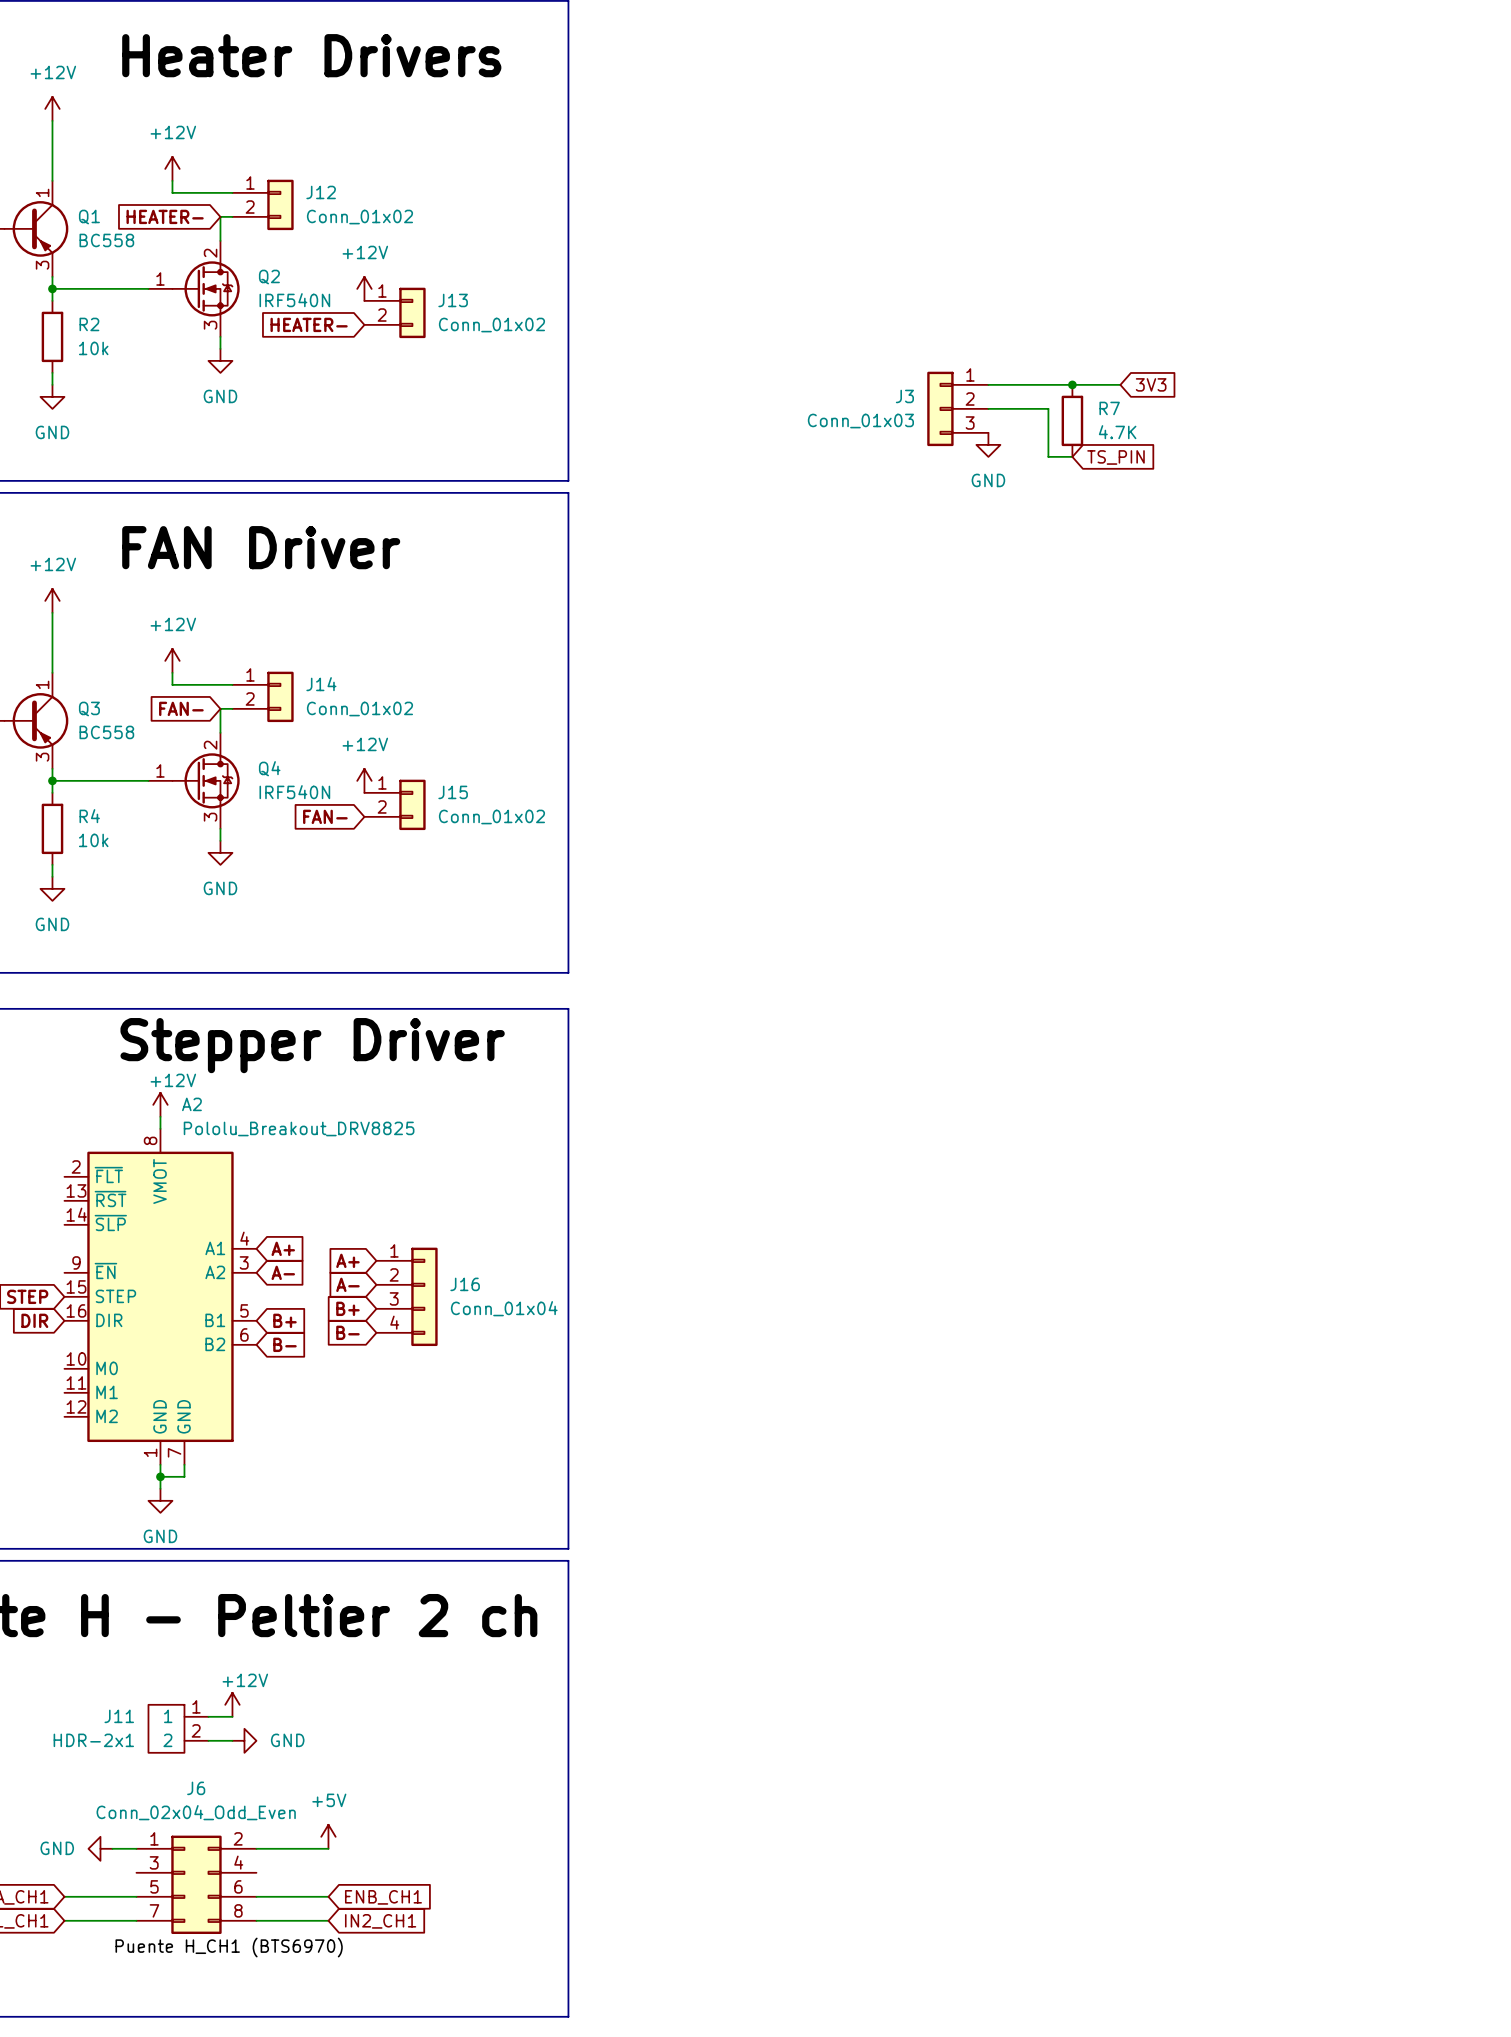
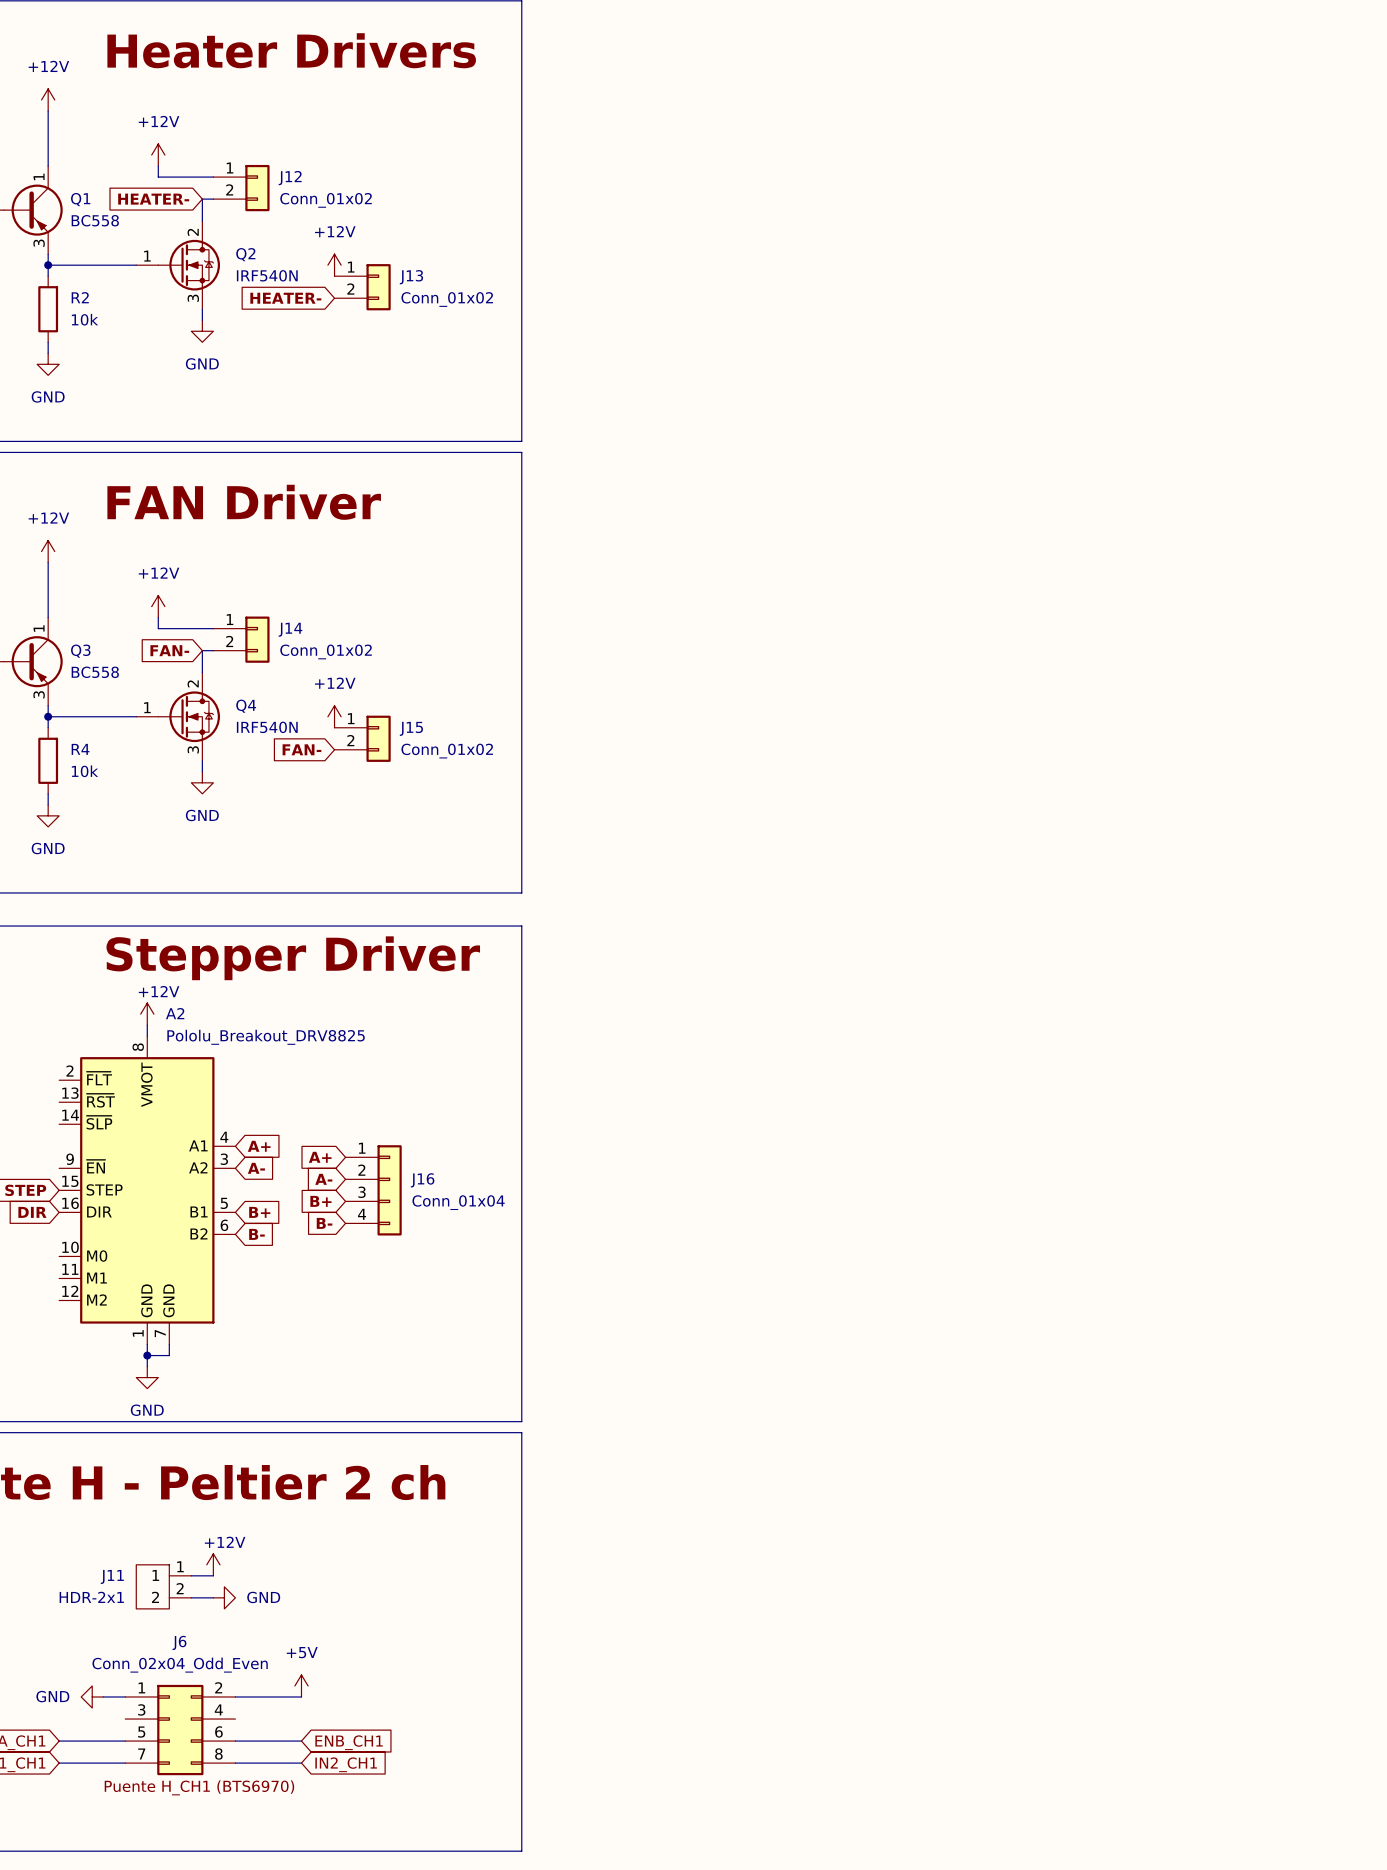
wire: (988, 384) (1120, 384) -> none
junction: (1072, 384) -> none
global label: 3V3 (1151, 384) -> none
J3: Conn_01x03 (957, 408) -> none
wire: (988, 408) (1048, 408) (1048, 456) (1072, 456) -> none
R7: 4.7K (1072, 420) -> none
power symbol: GND (988, 444) -> none
global label: TS_PIN (1116, 457) -> none

